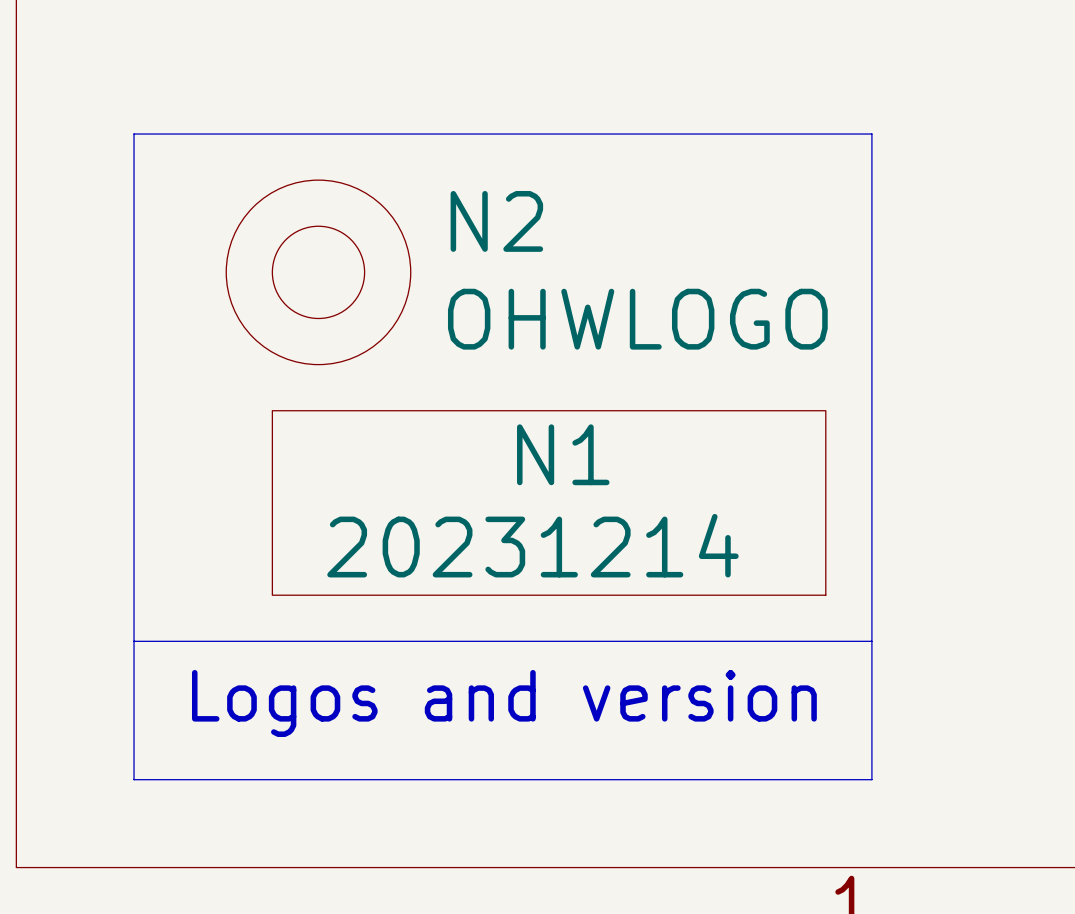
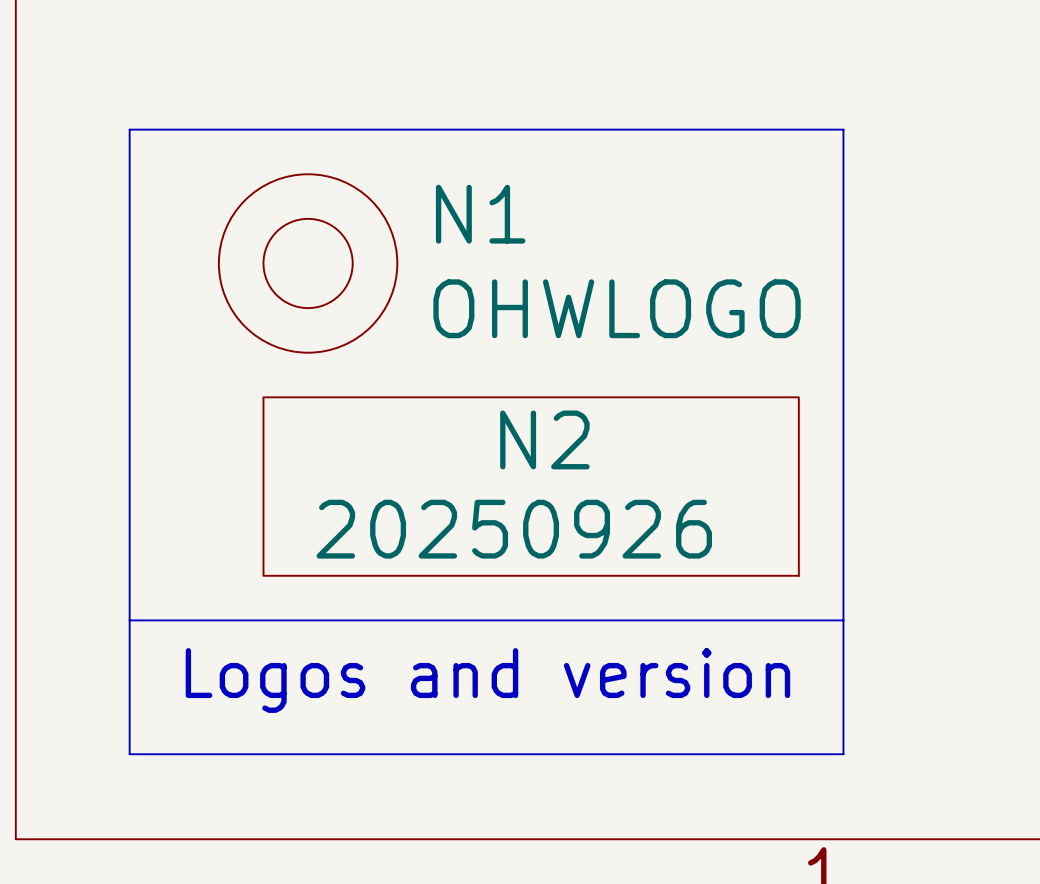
N2 name: N2 (496, 221) -> N1 (480, 214)
N1 name: N1 (563, 454) -> N2 (544, 439)
N1 value: 20231214 (532, 545) -> 20250926 (514, 529)

